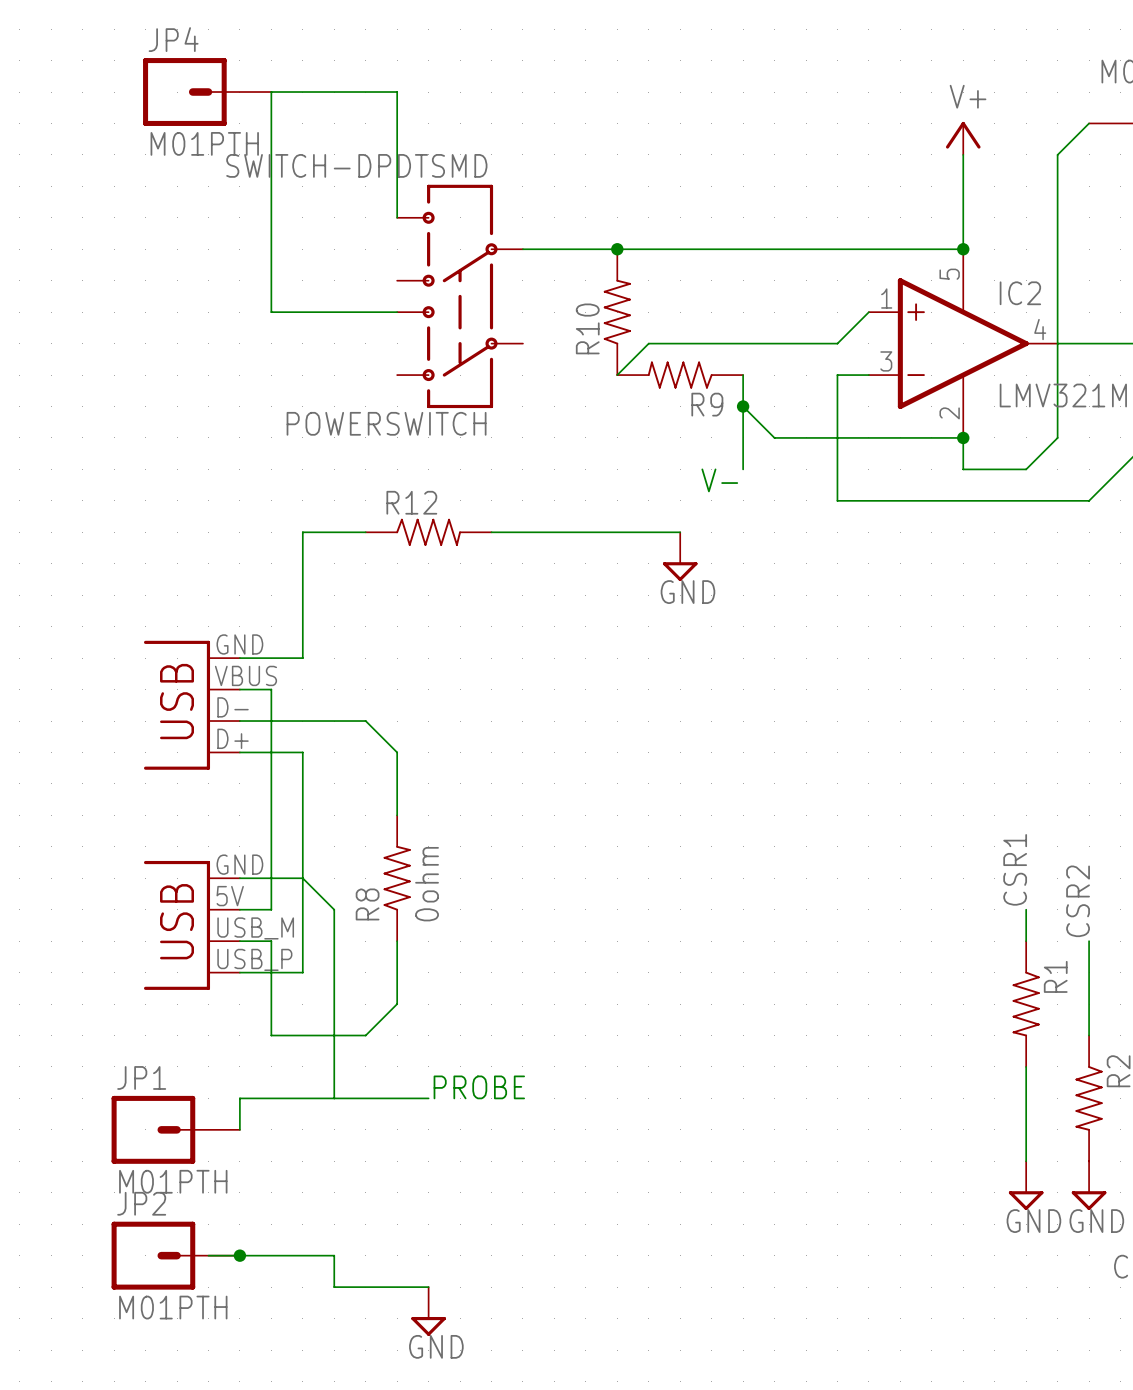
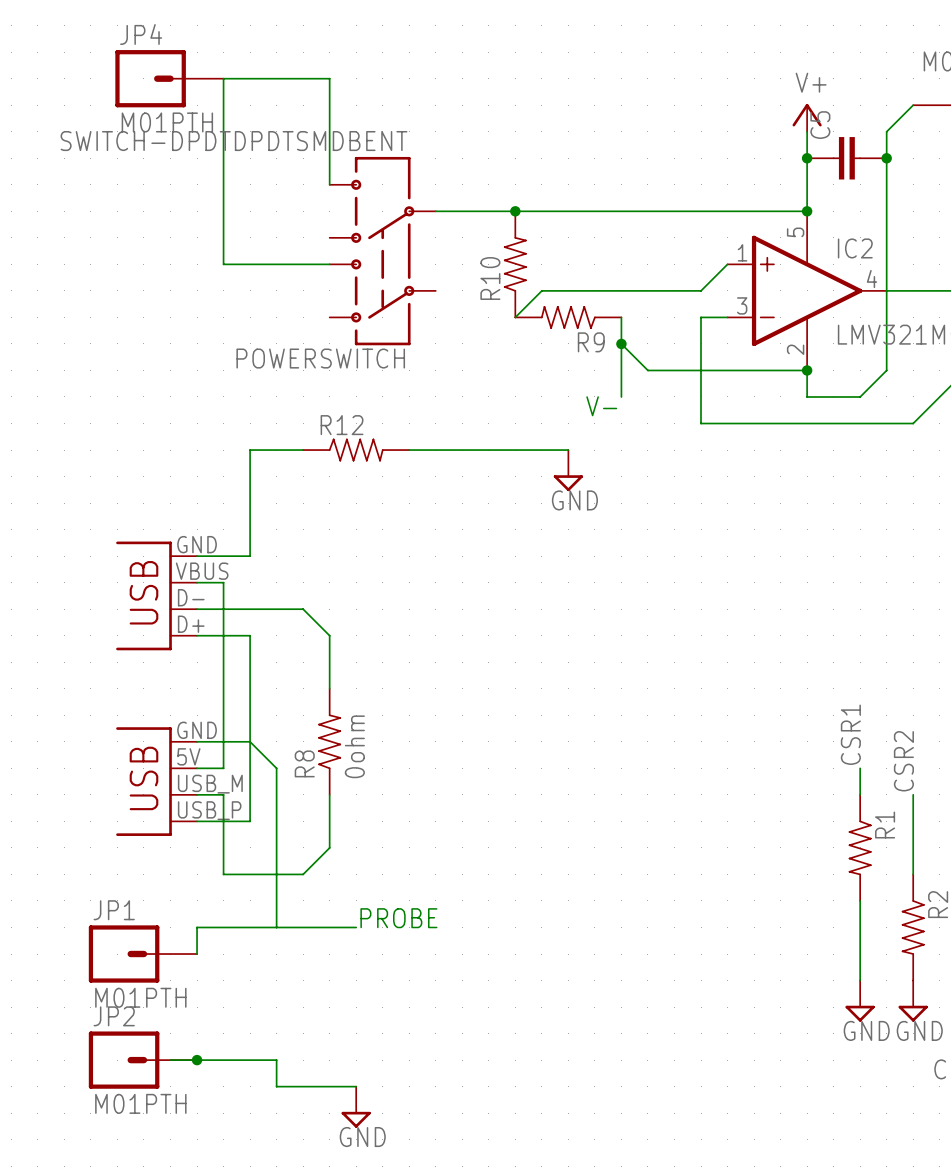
POWERSWITCH value: SWITCH-DPDTSMD (356, 165) -> SWITCH-DPDTDPDTSMDBENT (233, 141)
junction: none -> (807, 158)
C5: none -> (846, 158)
junction: none -> (886, 158)

